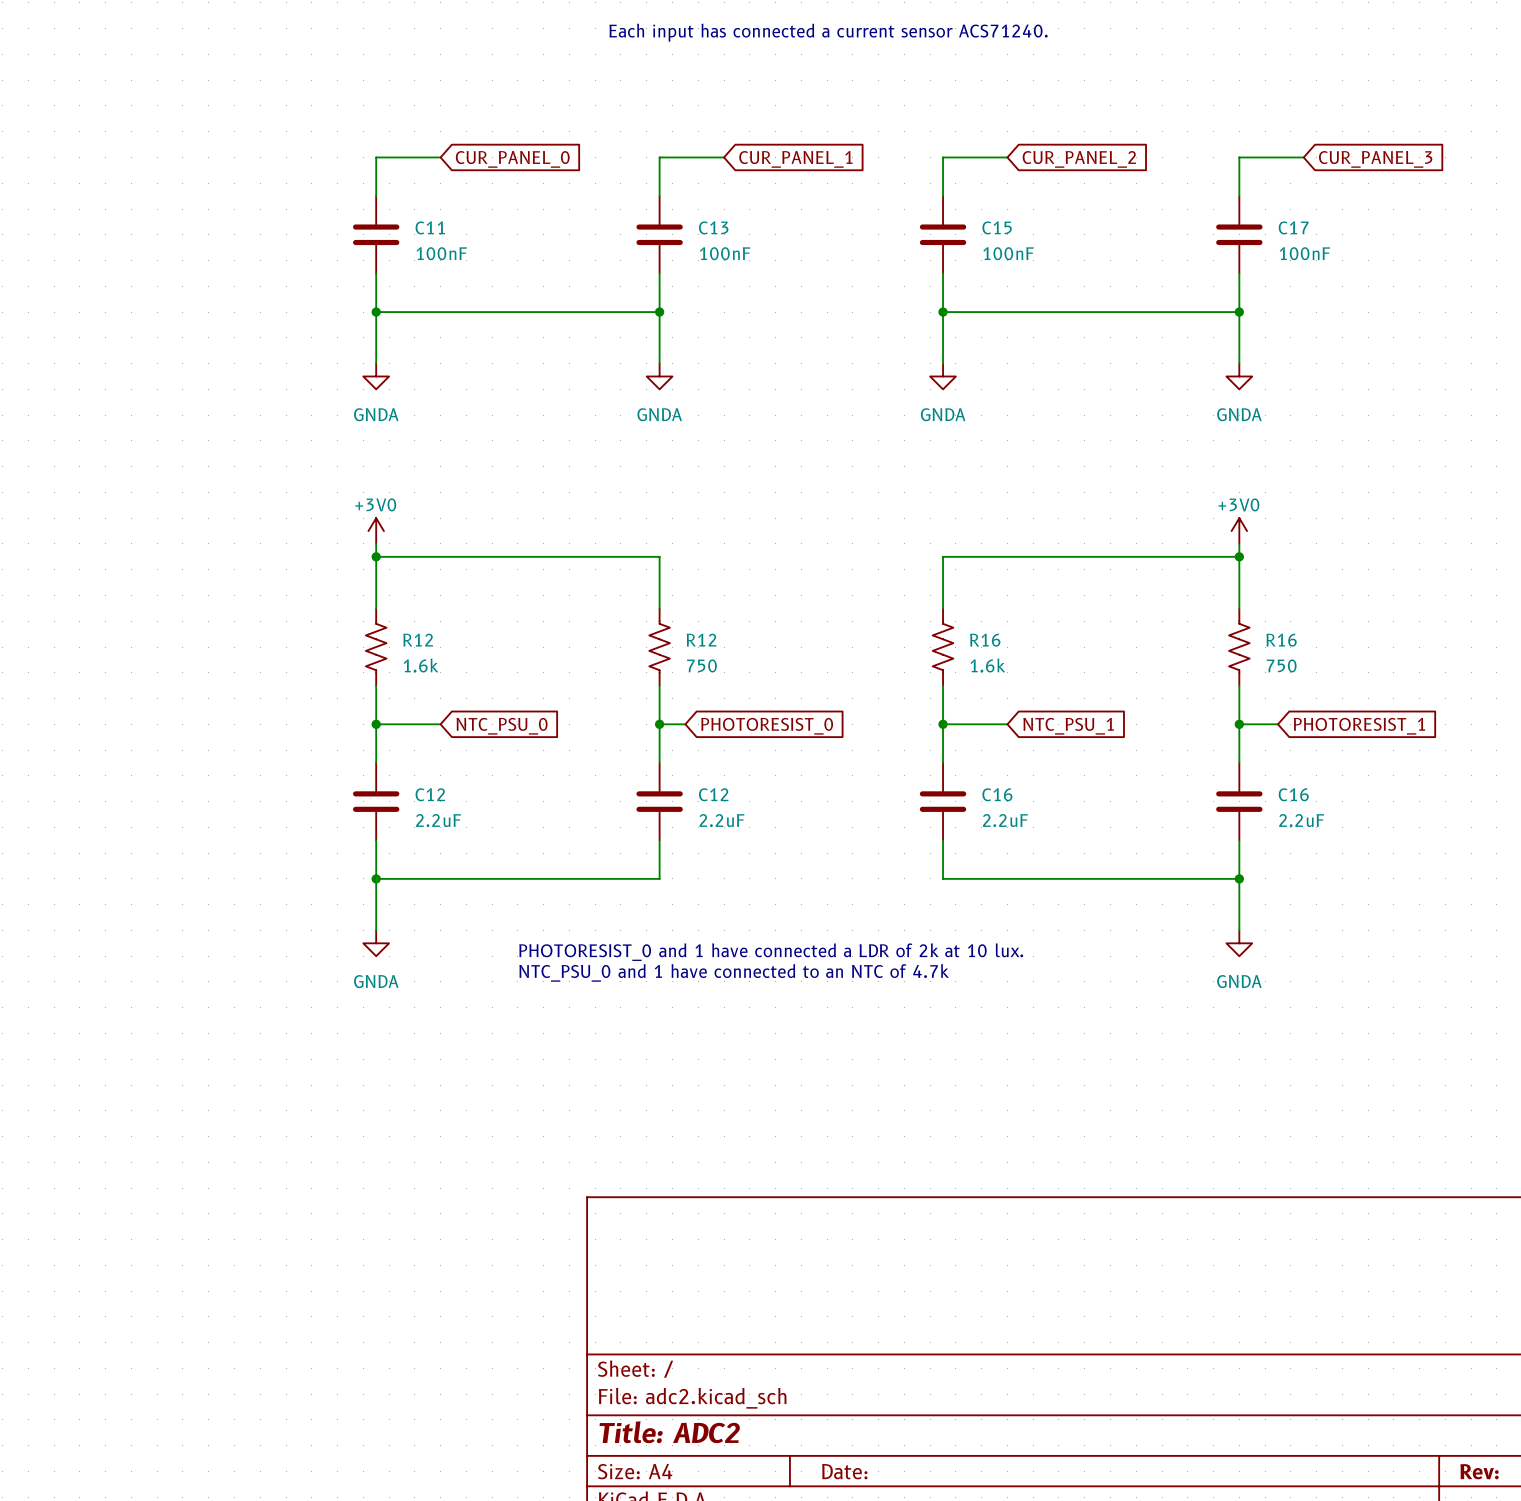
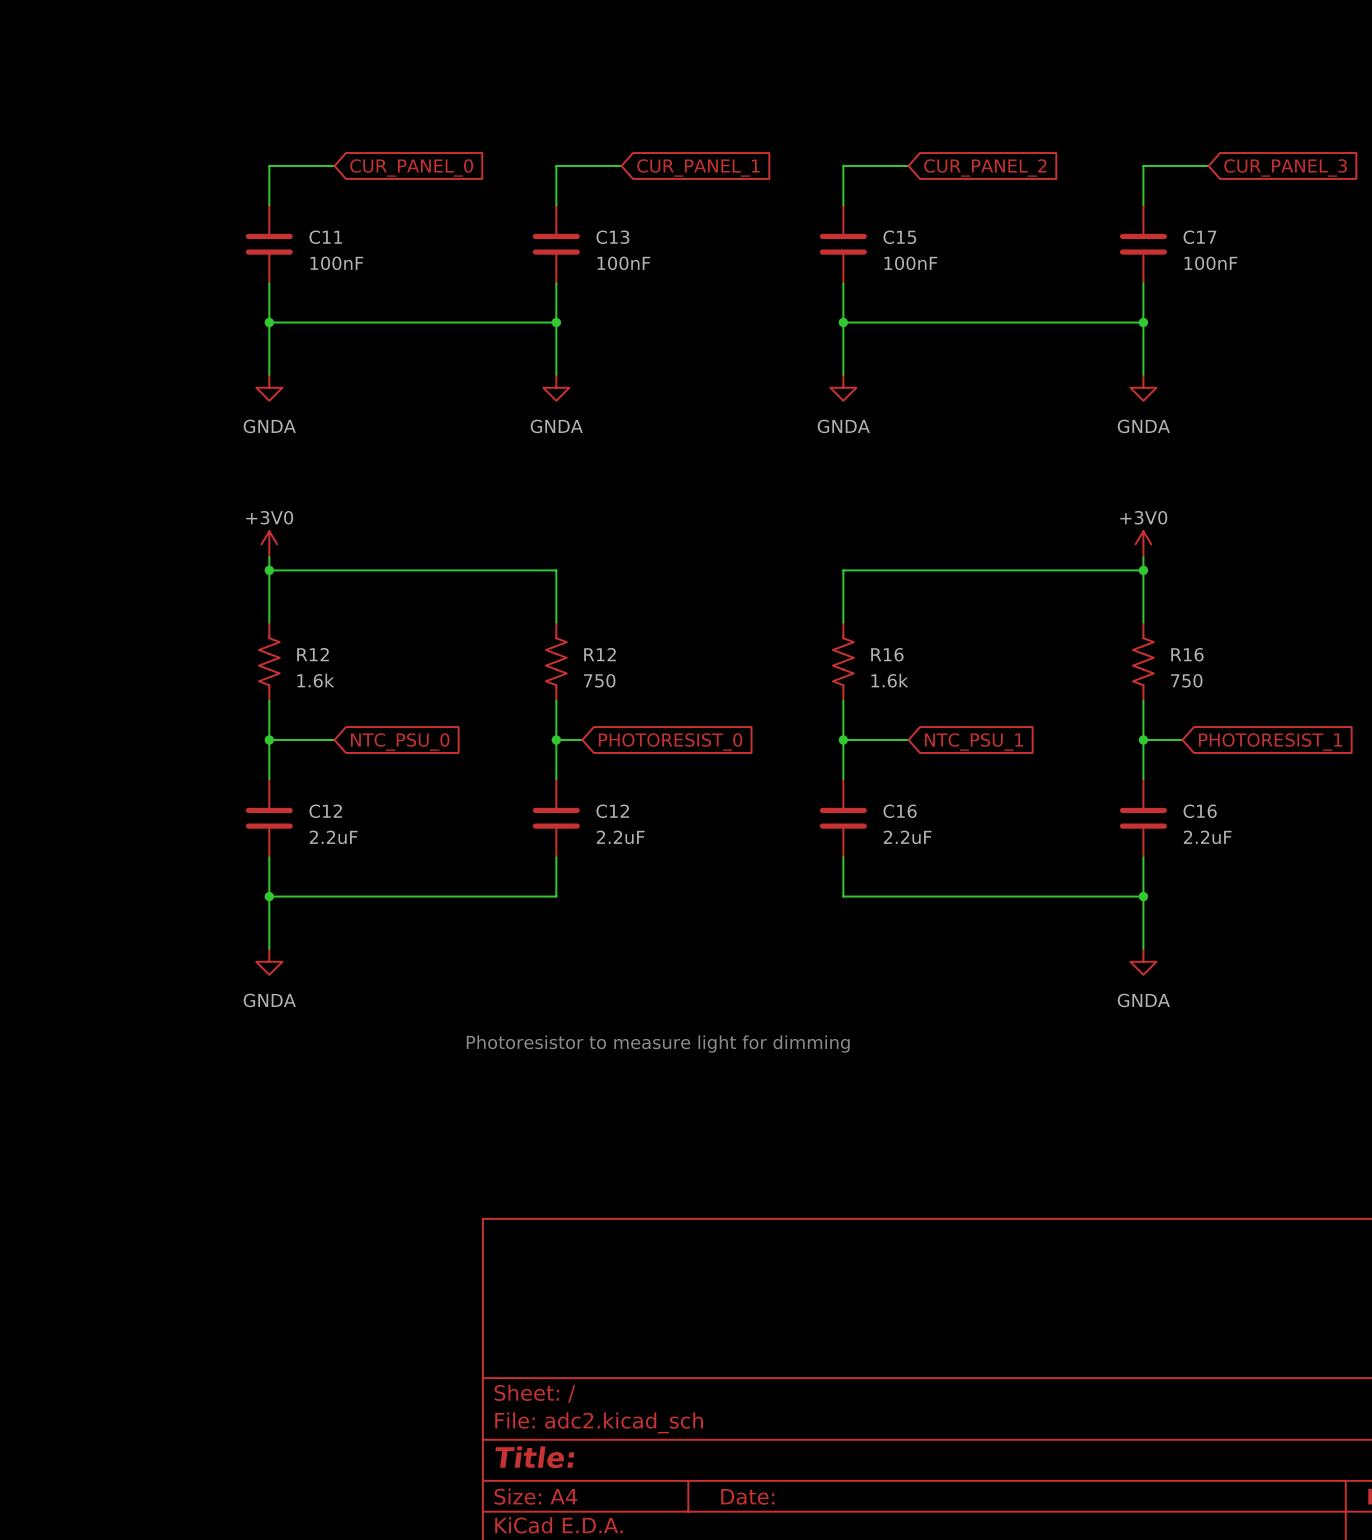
text: Each input has connected a current sensor ACS71240. (828, 32) -> none
text: PHOTORESIST_0 and 1 have connected a LDR of 2k at 10 lux. (771, 952) -> none
text: NTC_PSU_0 and 1 have connected to an NTC of 4.7k (734, 972) -> none
text: none -> Photoresistor to measure light for dimming (658, 1044)
title block: Title: ADC2 (669, 1432) -> Title: (534, 1457)

